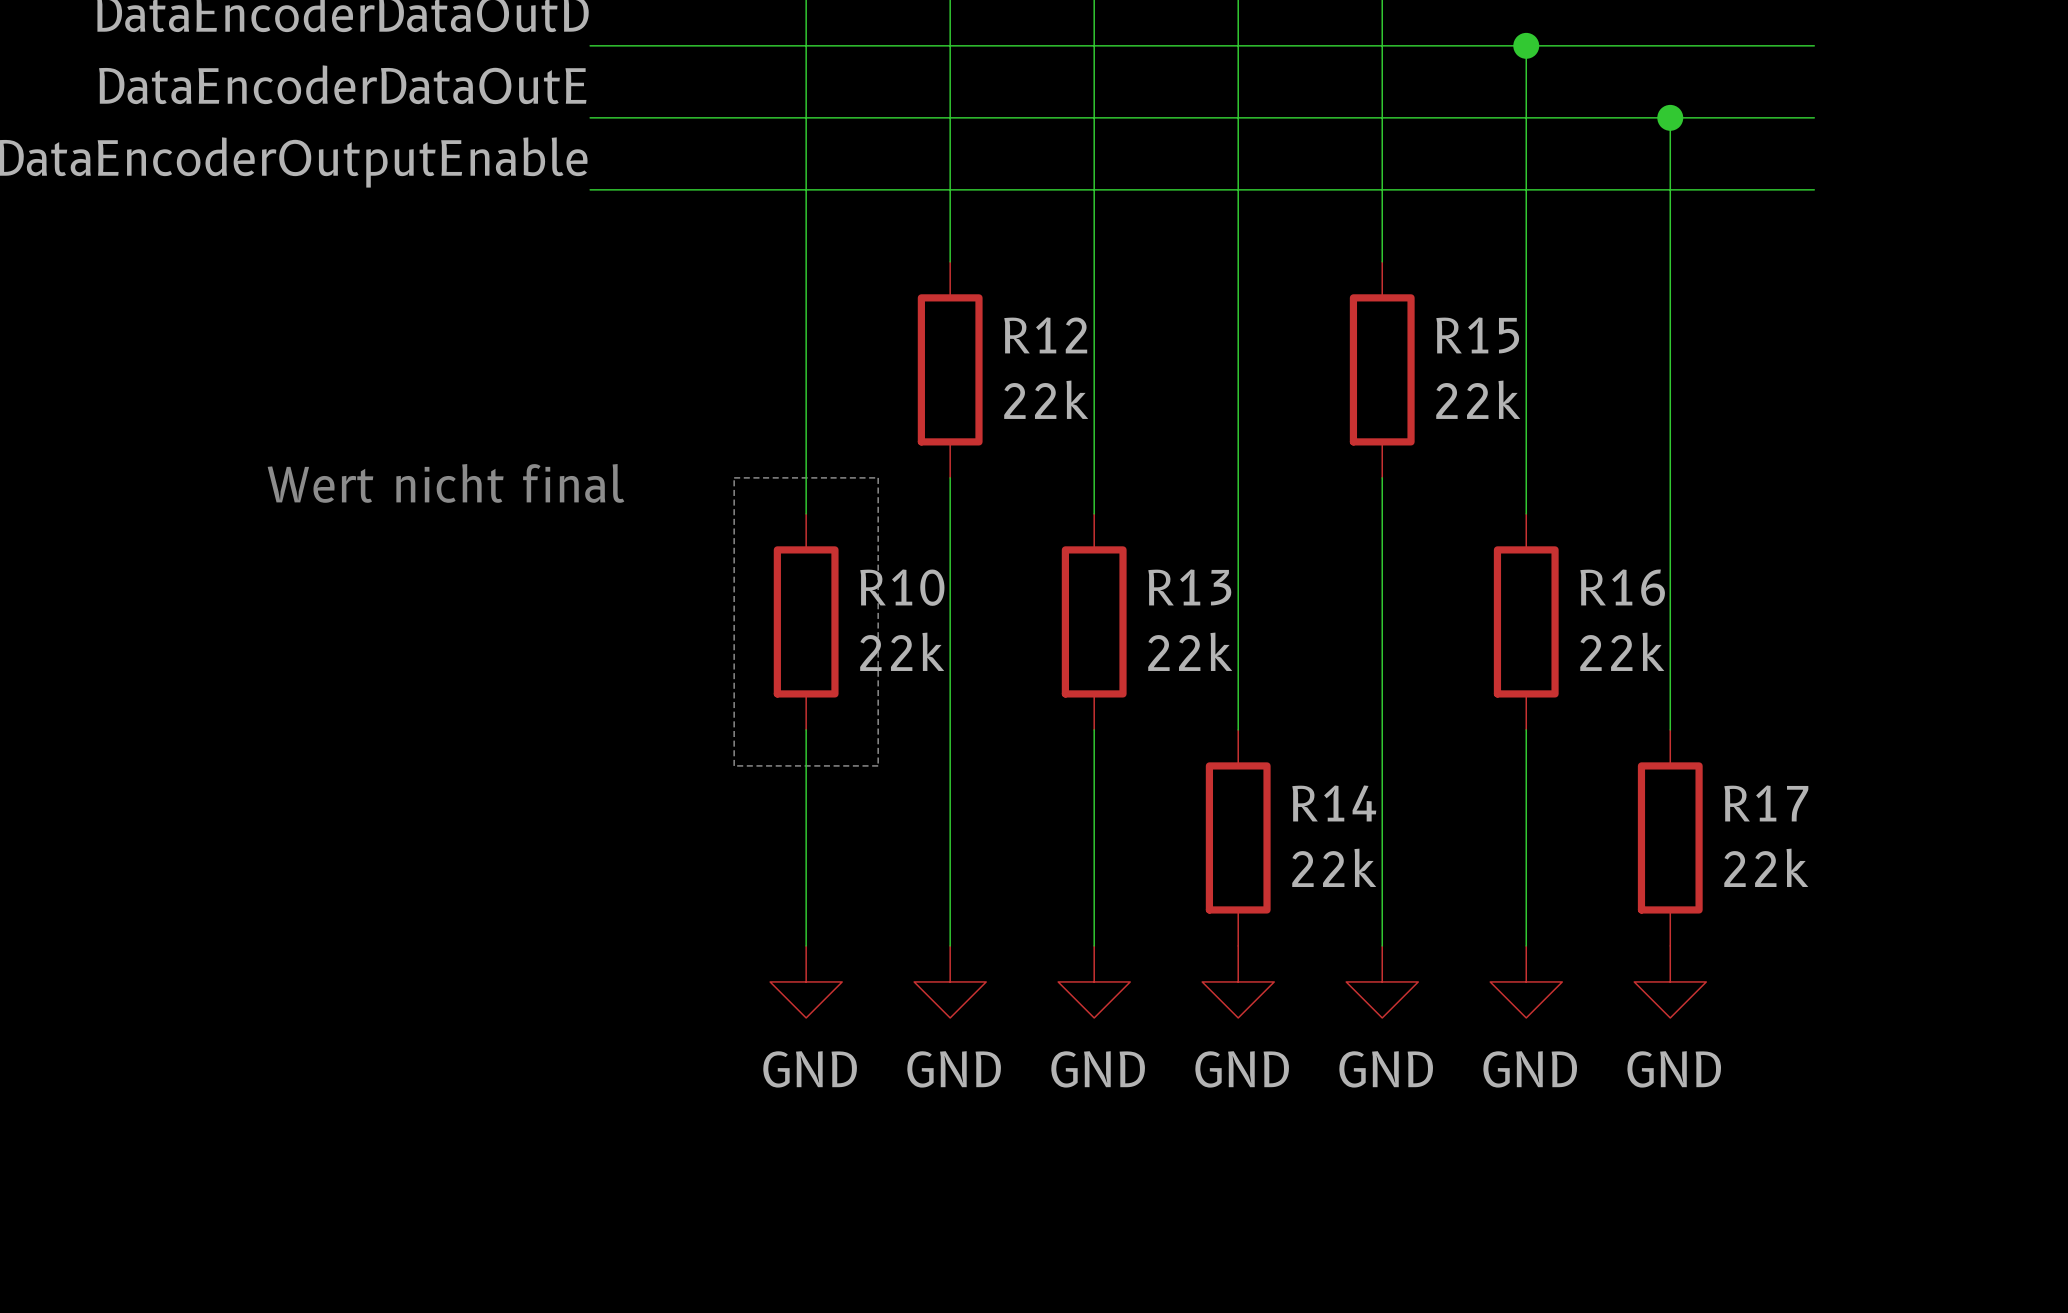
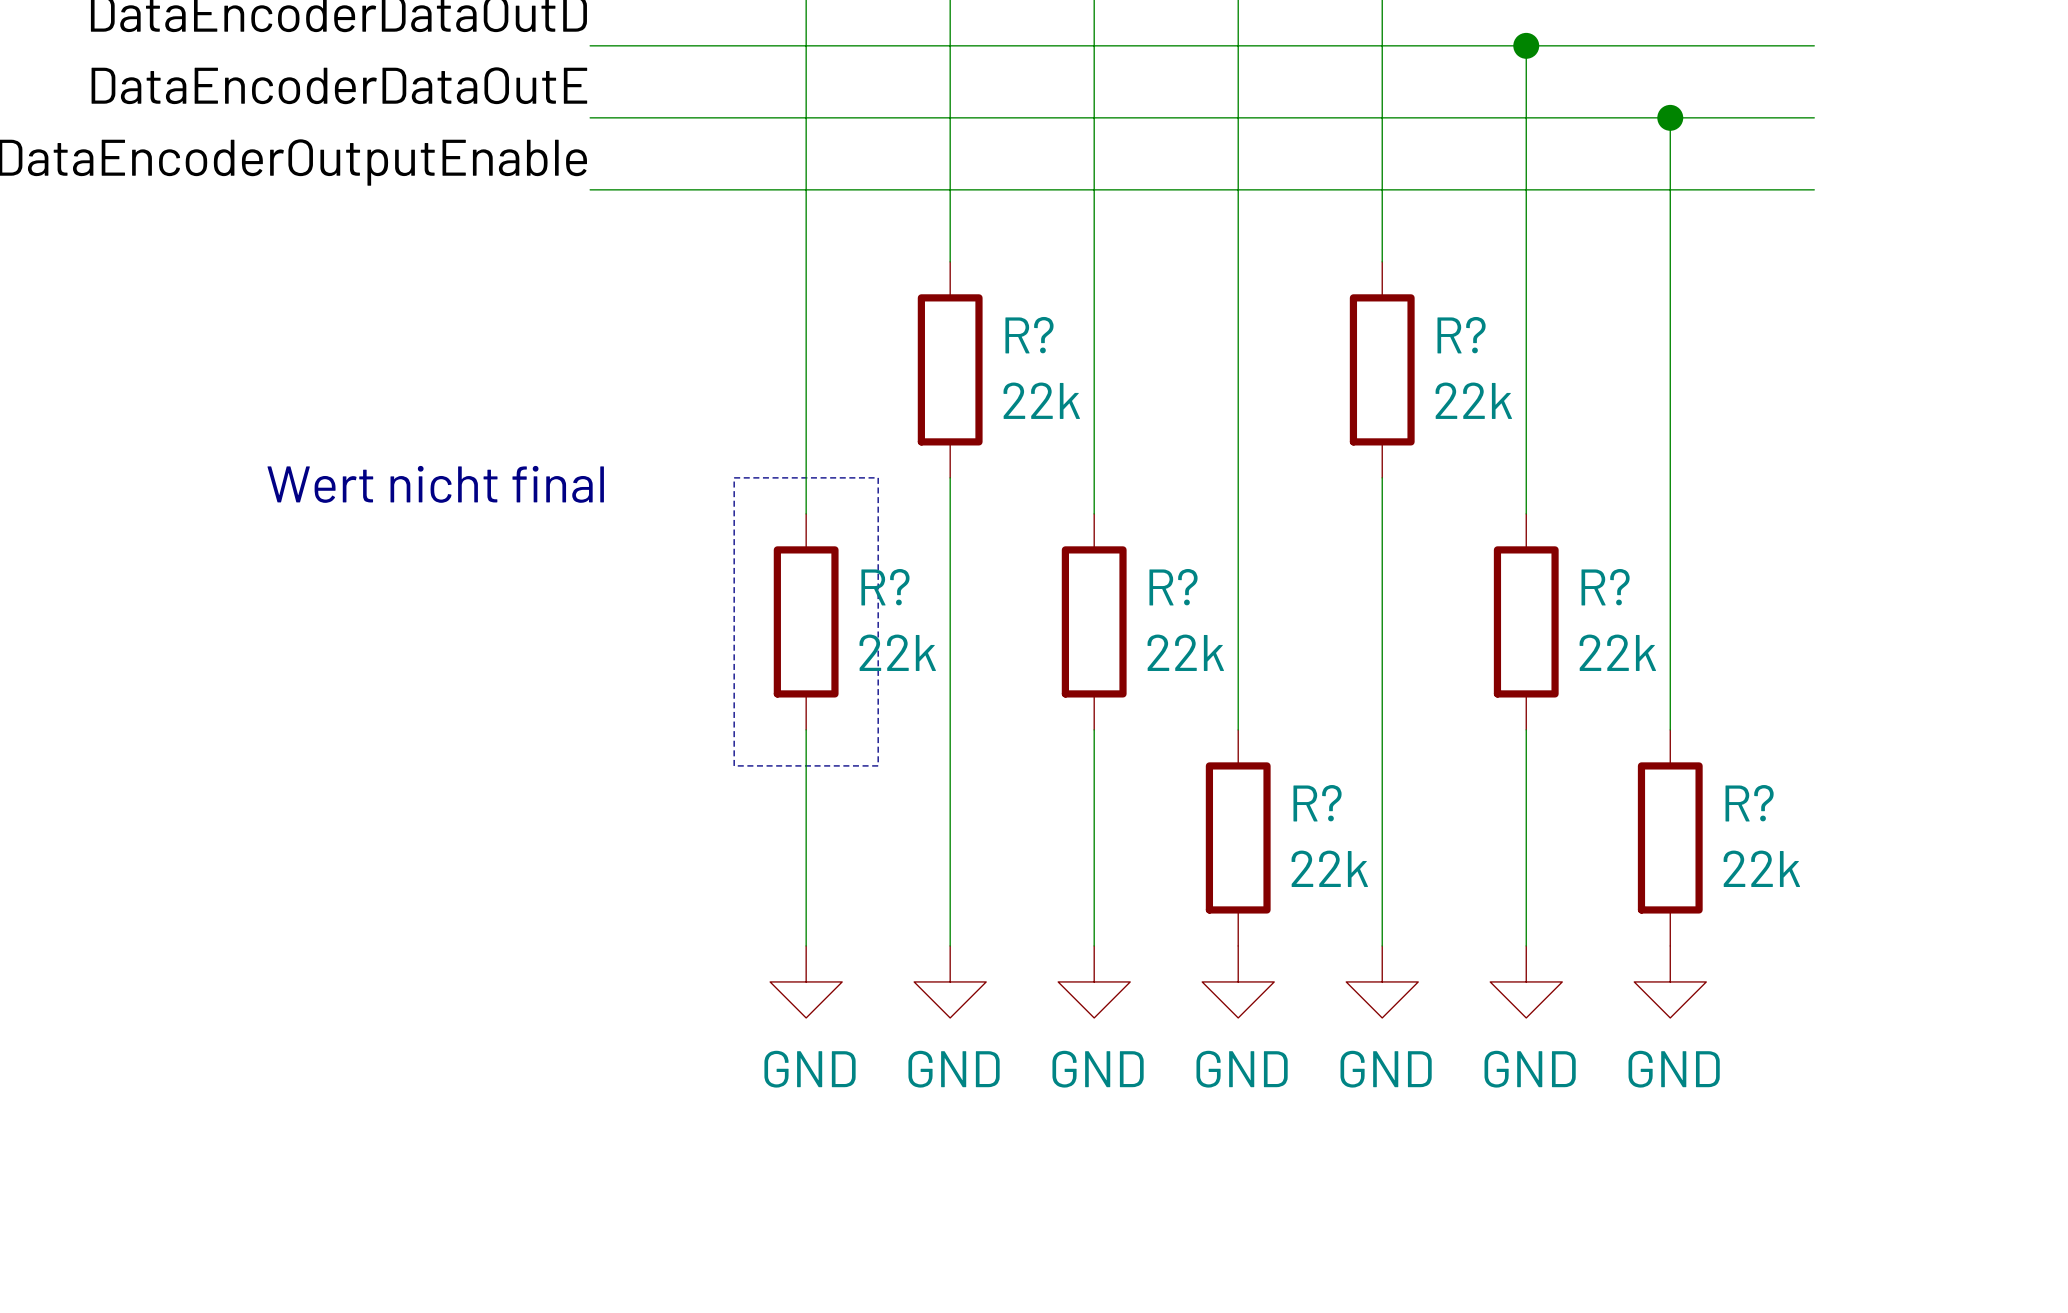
R12 name: R12 (1045, 335) -> R? (1029, 335)
R15 name: R15 (1477, 335) -> R? (1461, 335)
R10 name: R10 (902, 587) -> R? (885, 587)
R13 name: R13 (1189, 587) -> R? (1173, 587)
R16 name: R16 (1622, 587) -> R? (1605, 587)
R14 name: R14 (1334, 803) -> R? (1317, 803)
R17 name: R17 (1766, 803) -> R? (1749, 803)

